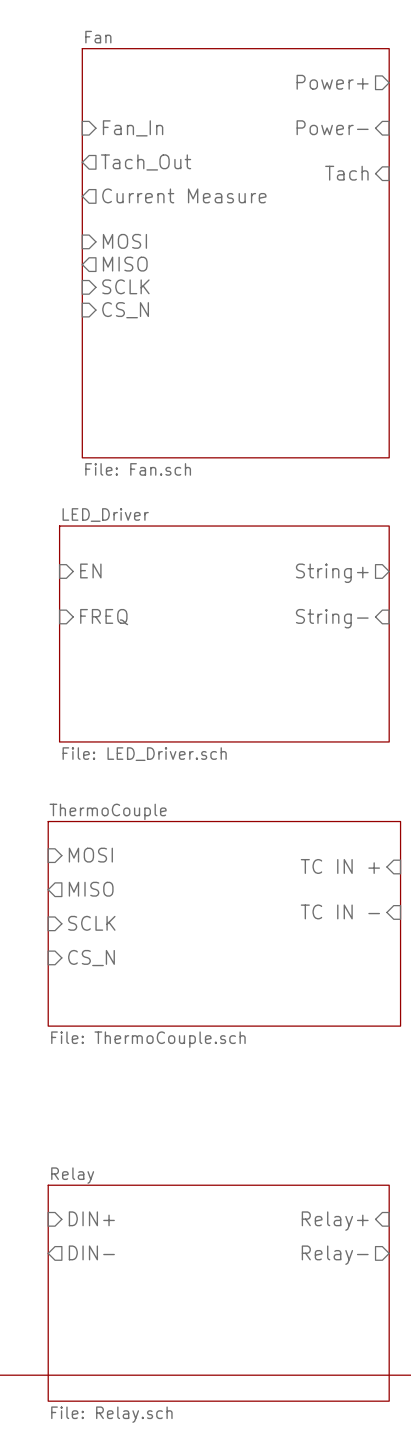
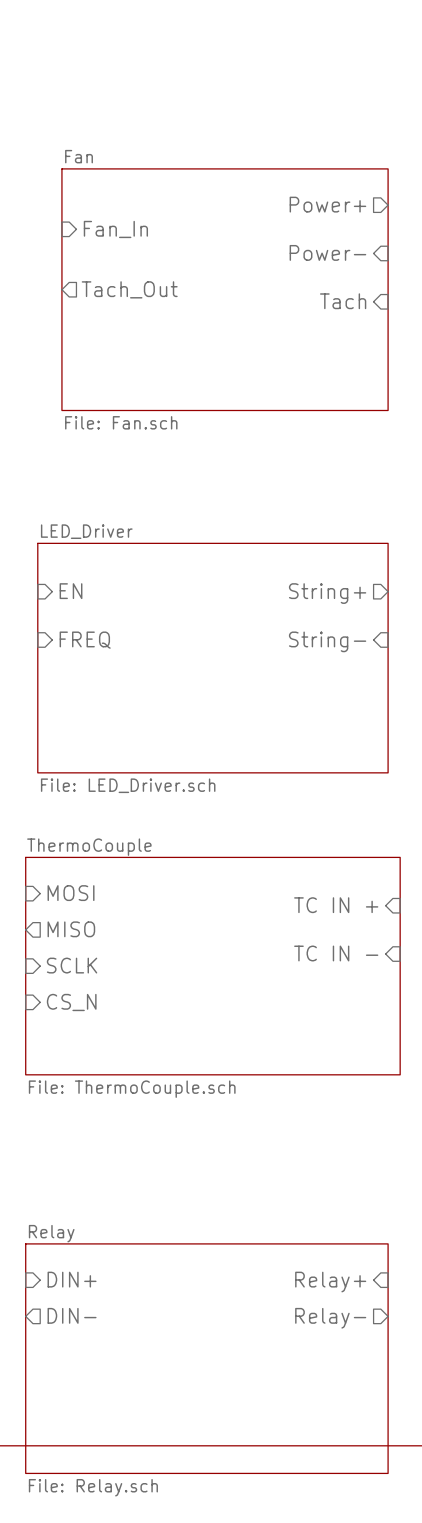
sheet pin position: Power+ (332, 82) -> Power+ (327, 204)
sheet pin position: Power- (332, 127) -> Power- (327, 252)
sheet pin position: Fan_In (133, 128) -> Fan_In (115, 229)
sheet pin: Tach_Out (146, 162) -> none
sheet pin position: Tach (346, 173) -> Tach (343, 301)
sheet pin: Current Measure (184, 195) -> none
sheet pin: MOSI (124, 241) -> none
sheet Fan: File: Fan.sch (235, 253) -> none
sheet pin: MISO (125, 264) -> none
sheet pin shape: input (125, 286) -> output (129, 289)
sheet pin: SCLK (125, 286) -> Tach_Out (129, 289)
sheet Fan: none -> File: Fan.sch (225, 289)
sheet pin: CS_N (125, 310) -> none

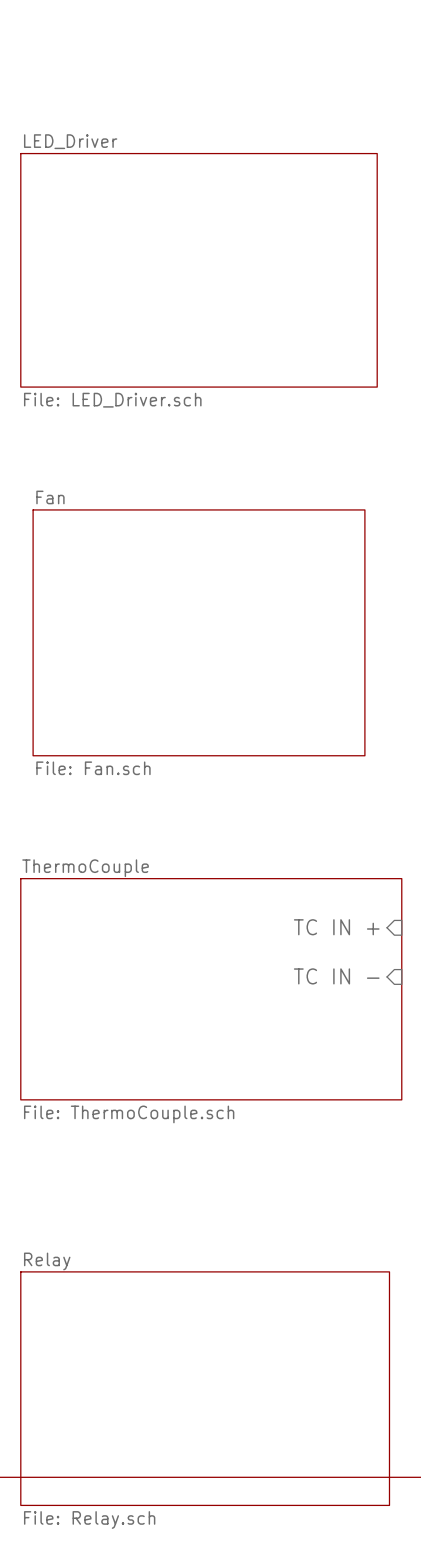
sheet pin: Power+ (327, 204) -> none
sheet pin: Fan_In (115, 229) -> none
sheet pin: Power- (327, 252) -> none
sheet LED_Driver: none -> File: LED_Driver.sch (199, 270)
sheet pin: Tach_Out (129, 289) -> none
sheet Fan: File: Fan.sch (225, 289) -> none
sheet pin: Tach (343, 301) -> none
sheet pin: EN (71, 591) -> none
sheet pin: String+ (327, 593) -> none
sheet Fan: none -> File: Fan.sch (199, 632)
sheet pin: FREQ (85, 640) -> none
sheet pin: String- (327, 641) -> none
sheet LED_Driver: File: LED_Driver.sch (212, 658) -> none
sheet pin: MOSI (71, 893) -> none
sheet pin: MISO (71, 929) -> none
sheet pin: SCLK (72, 965) -> none
sheet pin: CS_N (71, 1002) -> none
sheet pin: DIN+ (72, 1279) -> none
sheet pin: Relay+ (330, 1282) -> none
sheet pin: DIN- (72, 1315) -> none
sheet pin: Relay- (330, 1318) -> none

